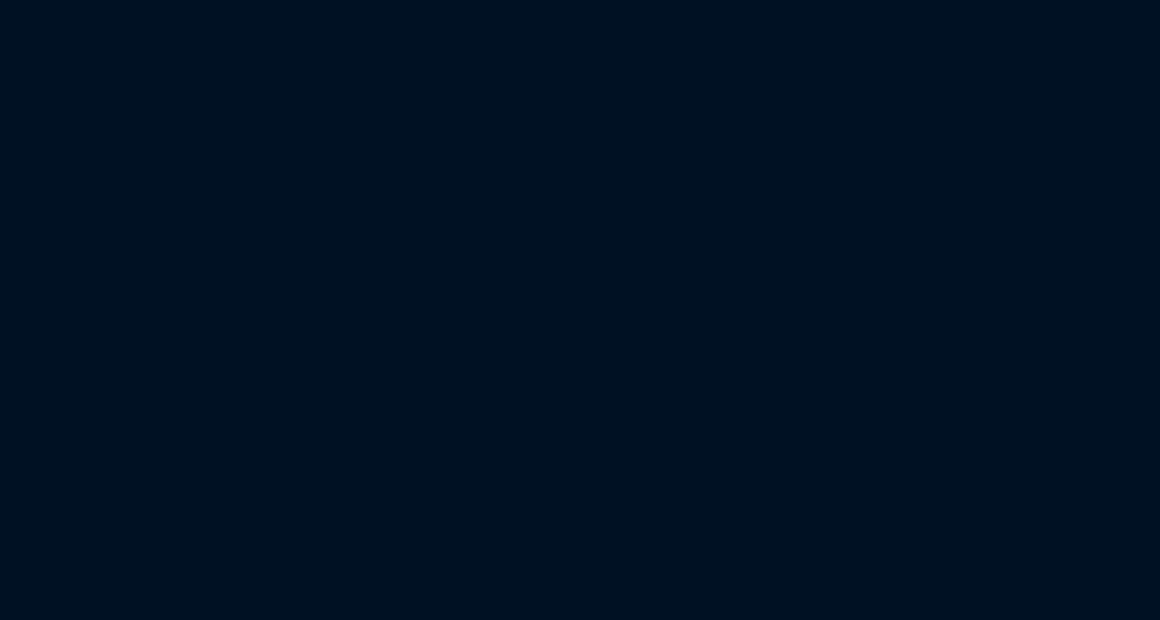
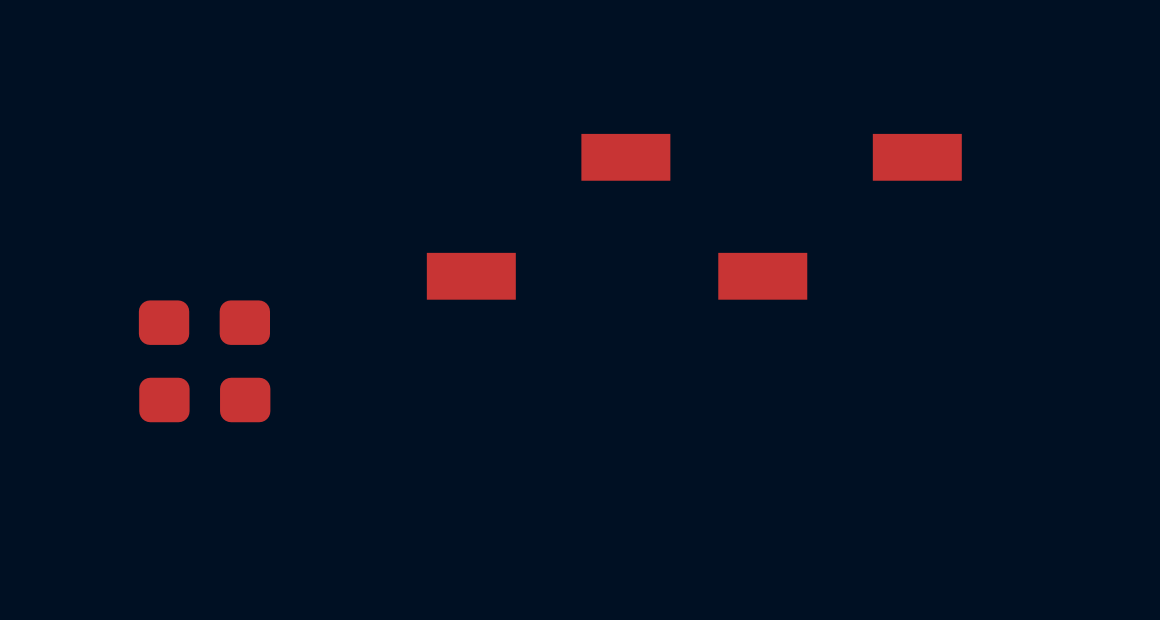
part: none -> (548, 216)
part: none -> (840, 216)
part: none -> (204, 322)
part: none -> (204, 399)

